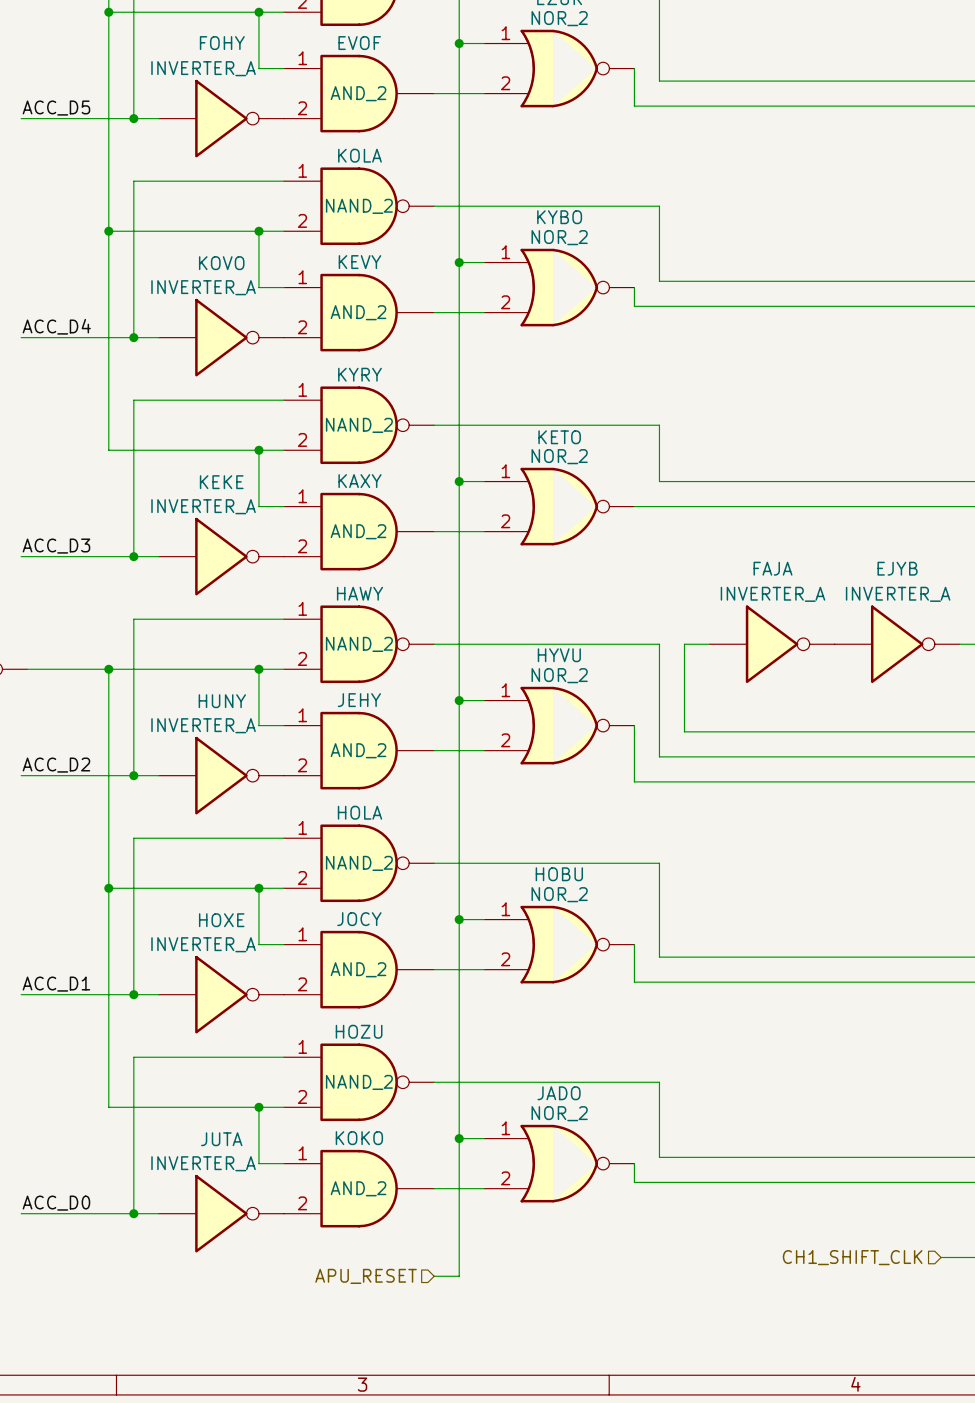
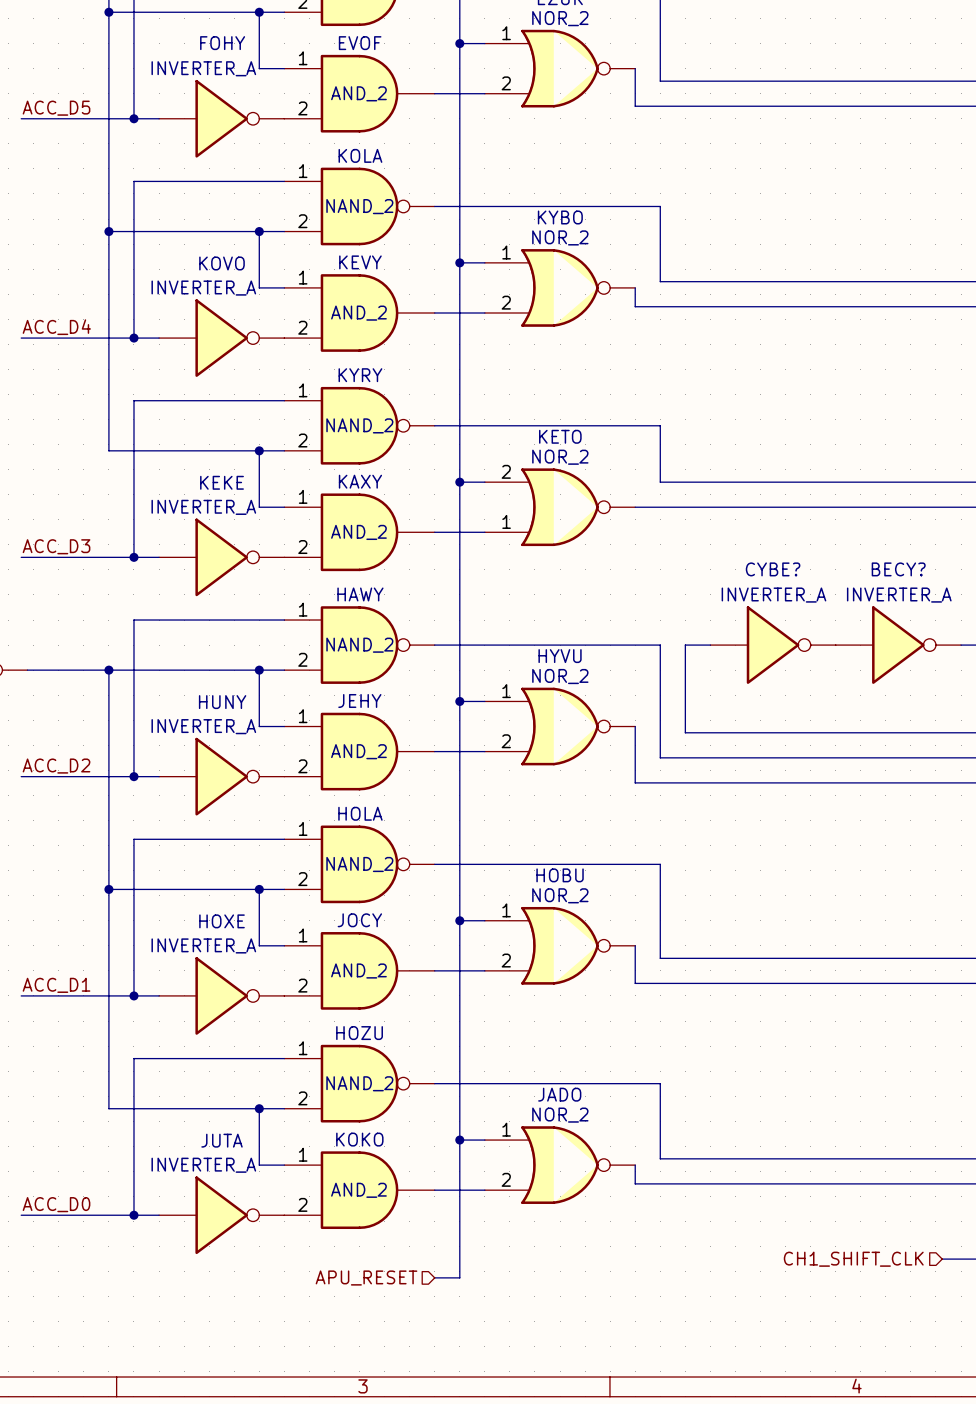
KETO flip: as is (559, 506) -> up-down (560, 507)
FAJA name: FAJA (772, 568) -> CYBE? (773, 569)
EJYB name: EJYB (897, 568) -> BECY? (898, 569)

